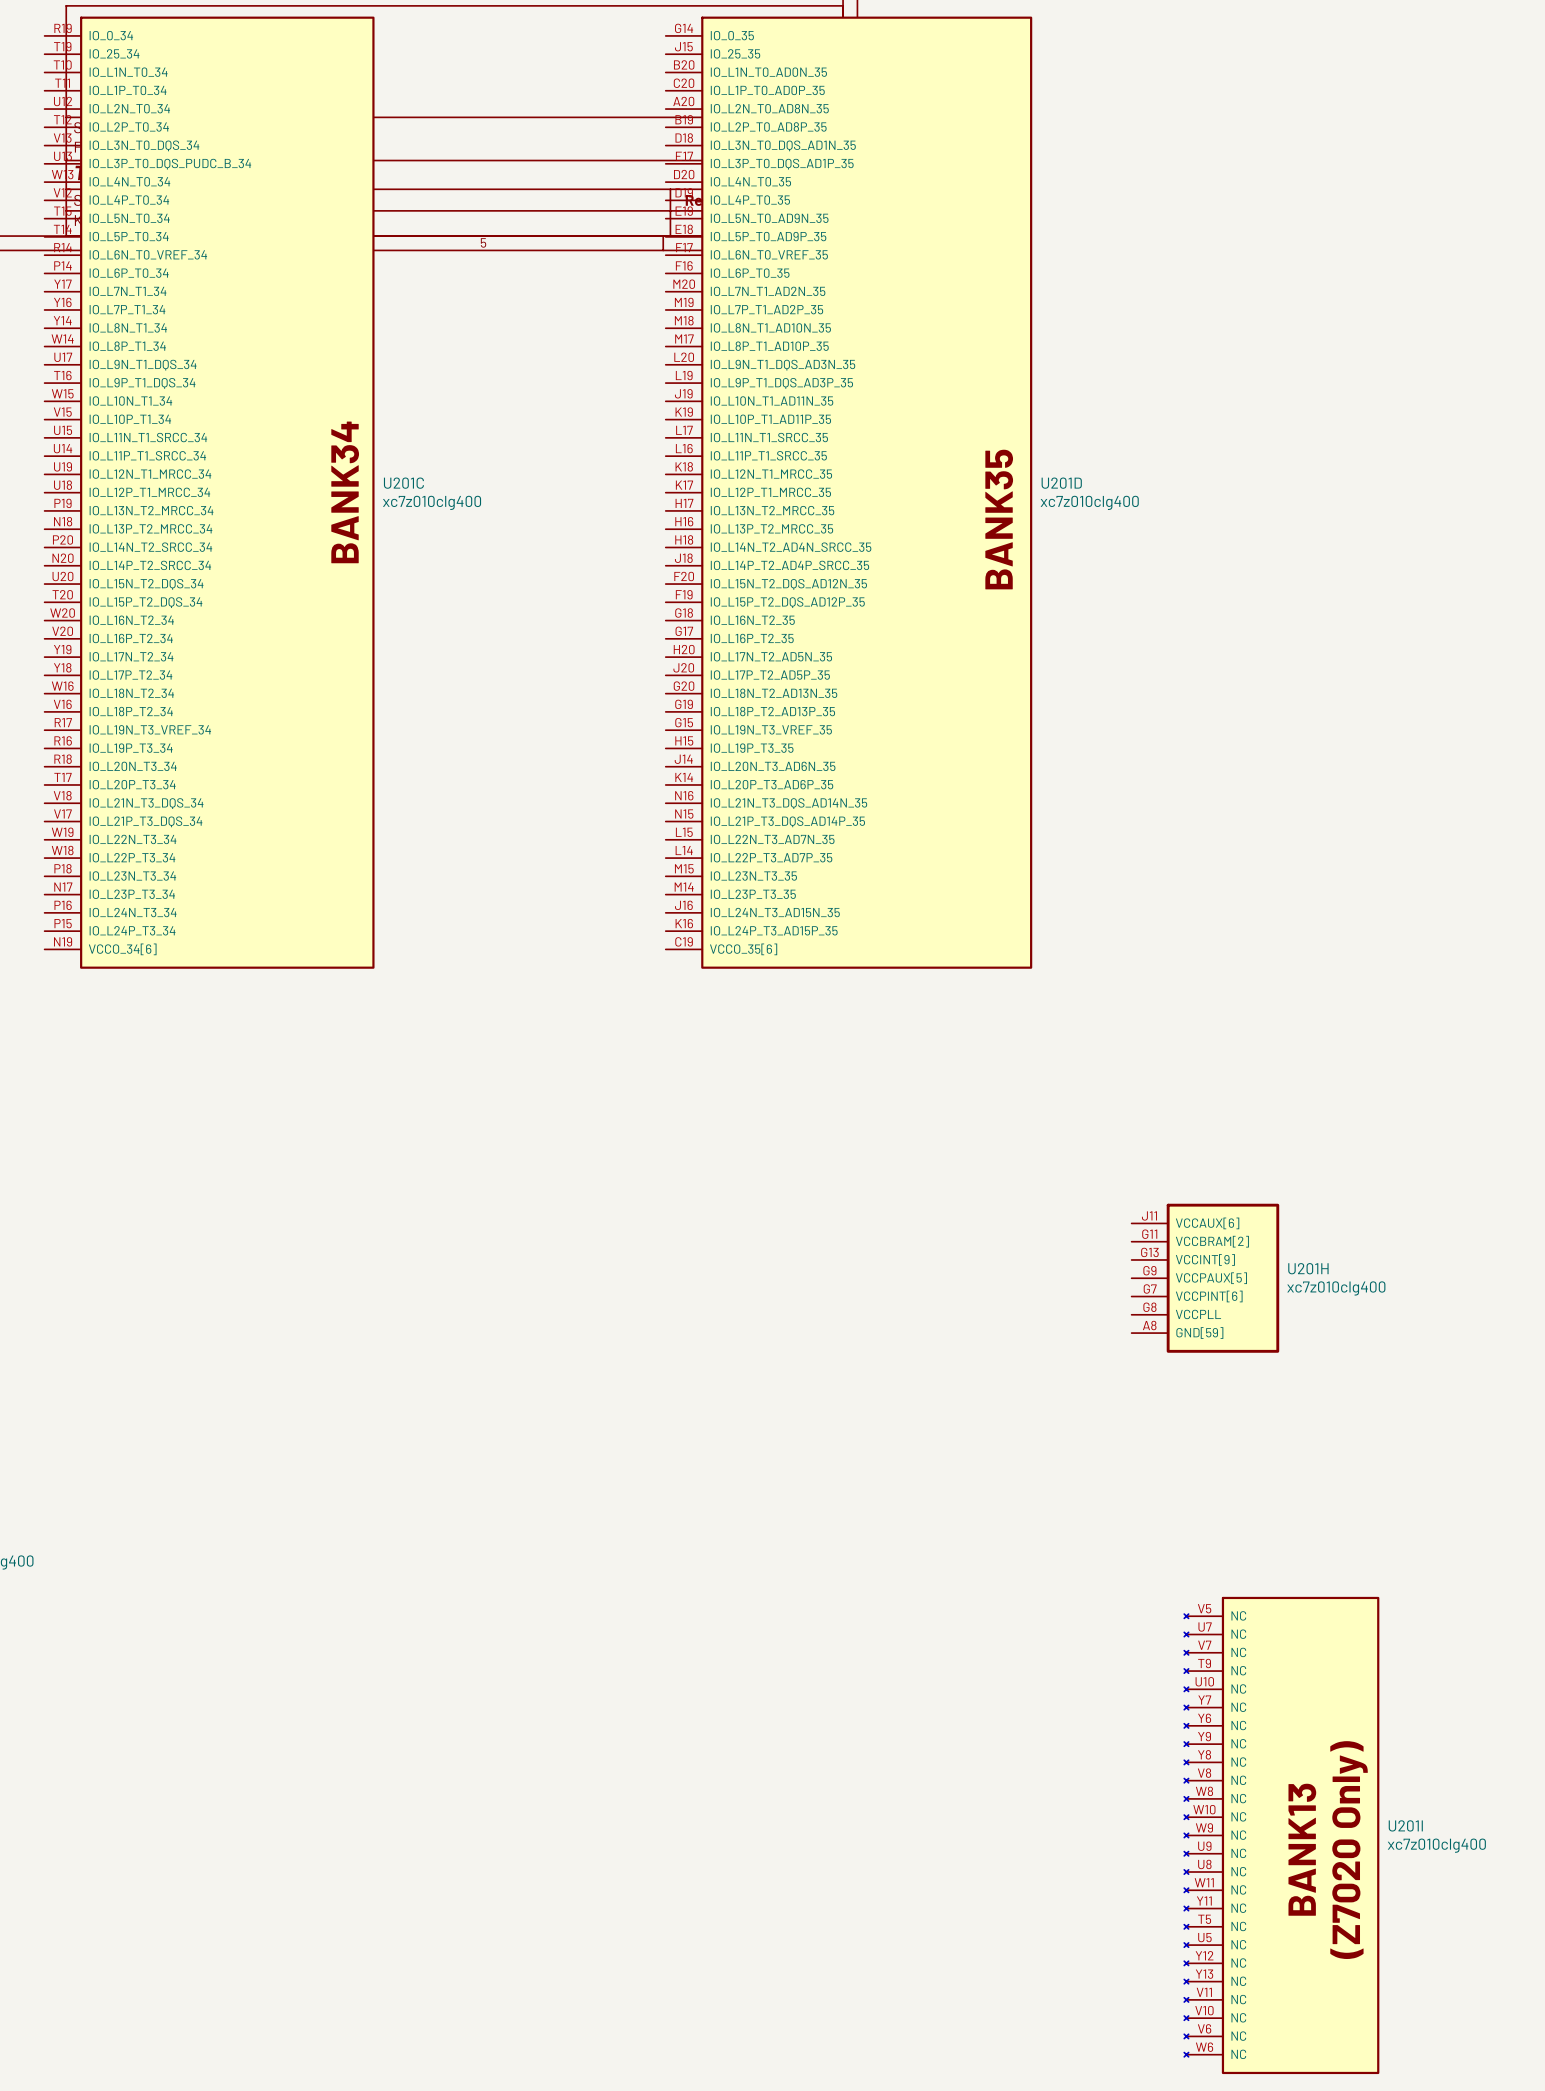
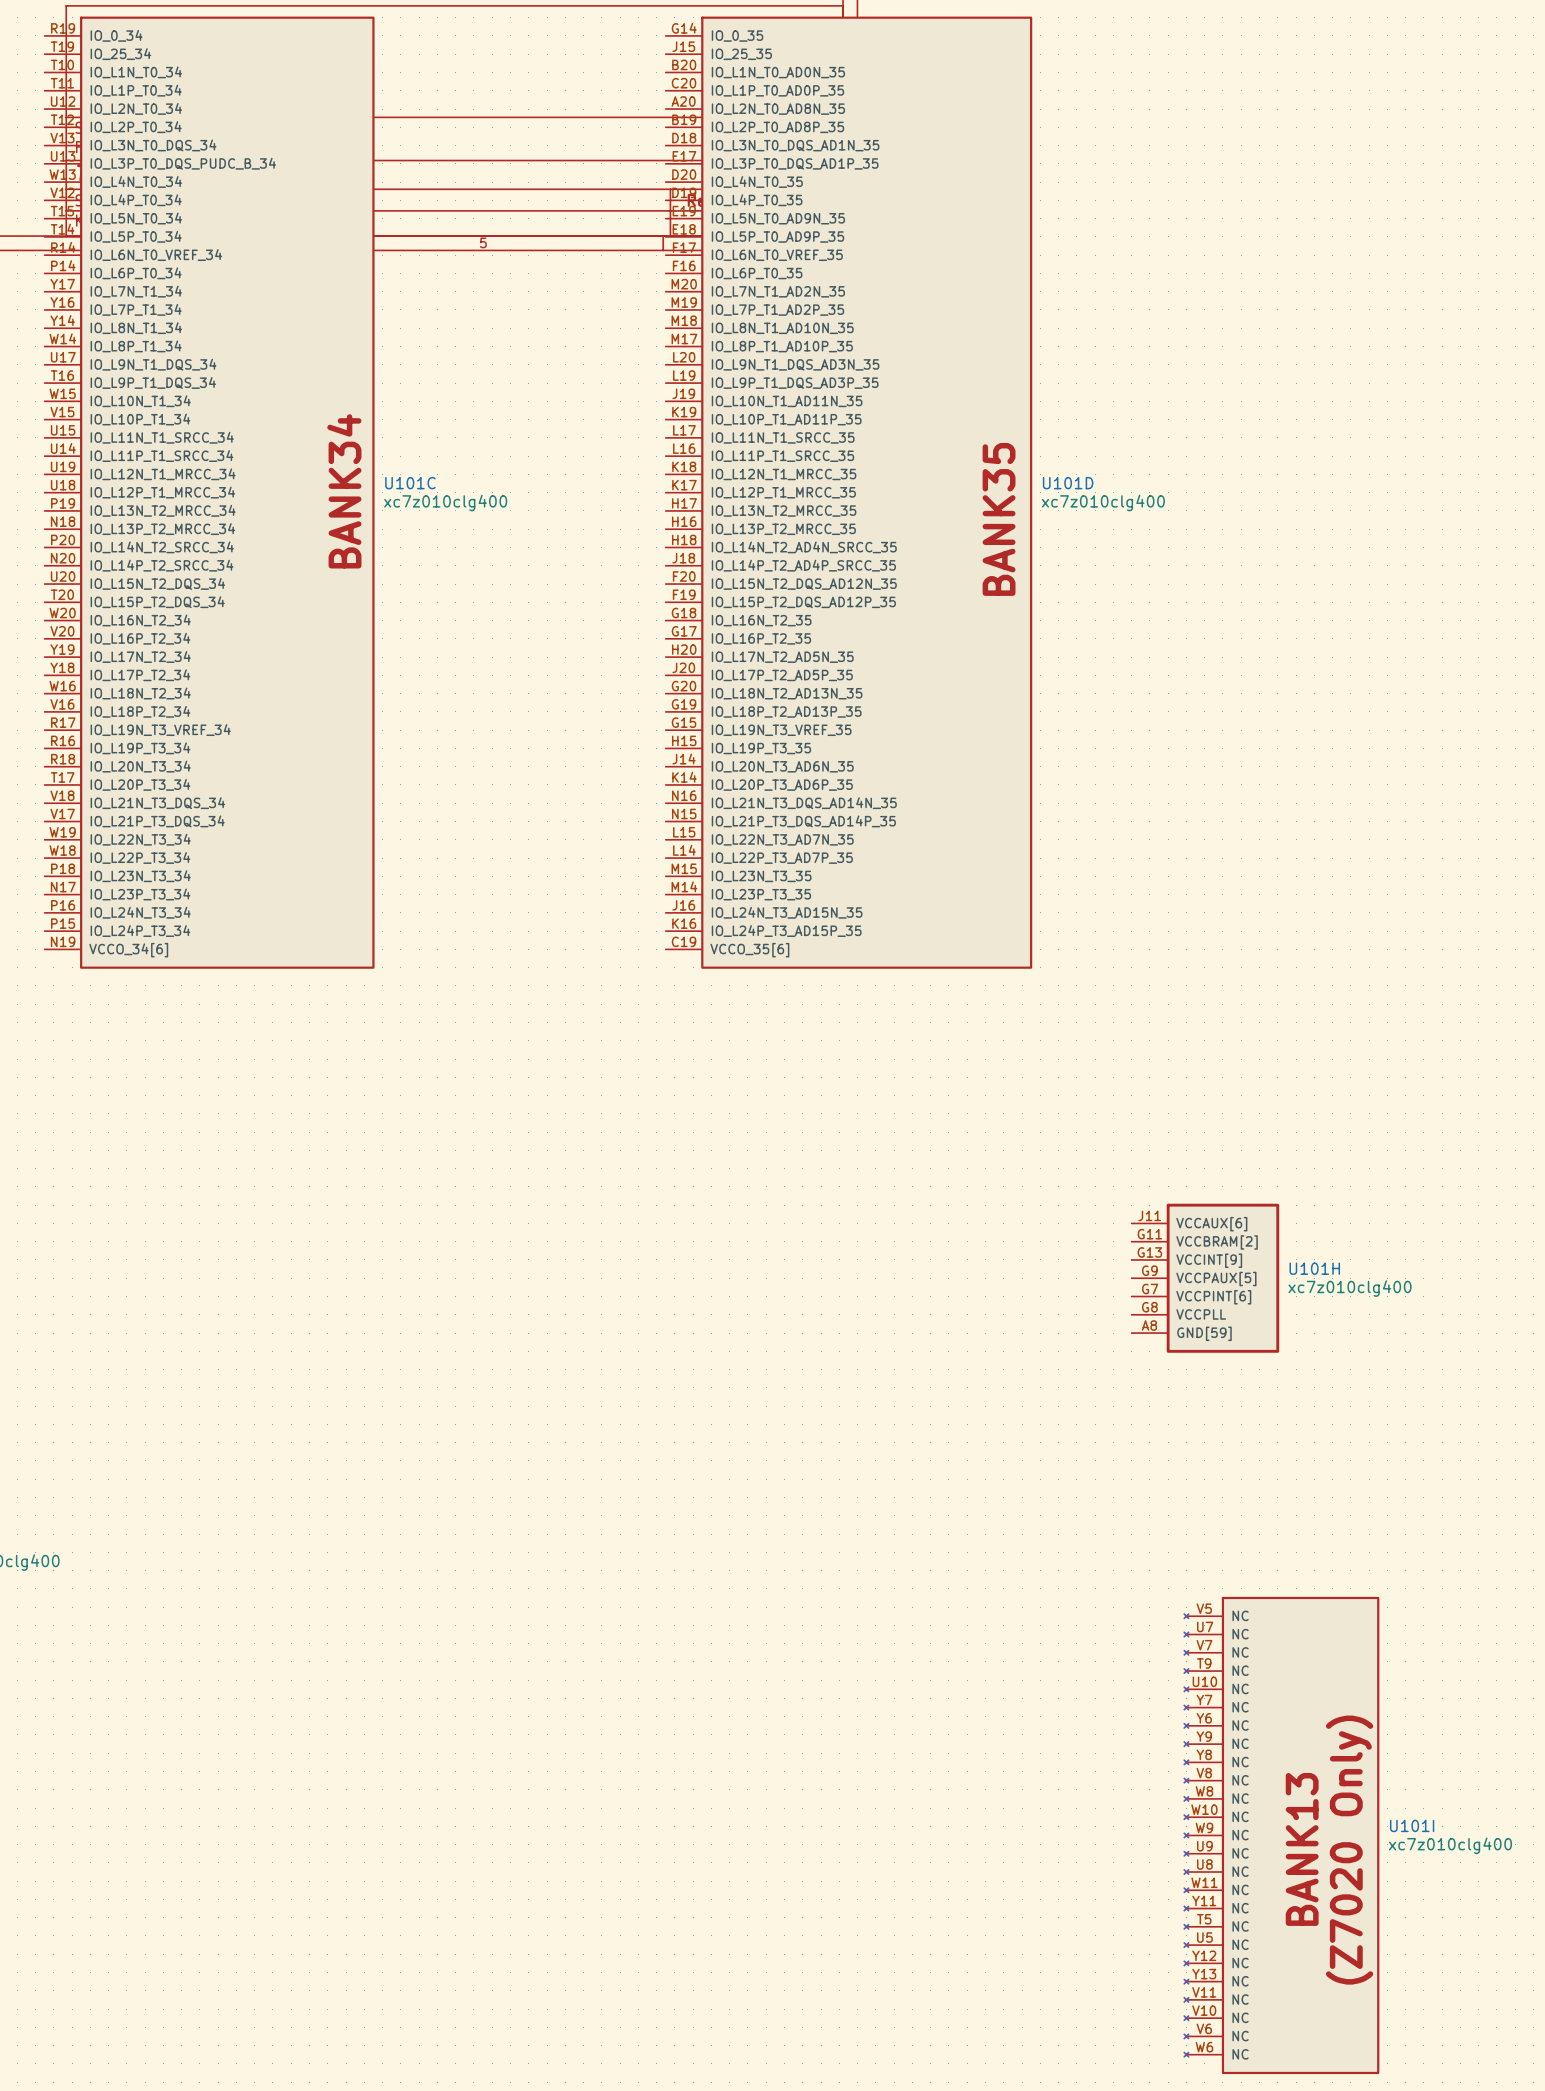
U201C name: U201C (403, 483) -> U101C (410, 483)
U201D name: U201D (1061, 483) -> U101D (1068, 483)
U201H name: U201H (1308, 1268) -> U101H (1314, 1268)
U201I name: U201I (1405, 1825) -> U101I (1412, 1825)

